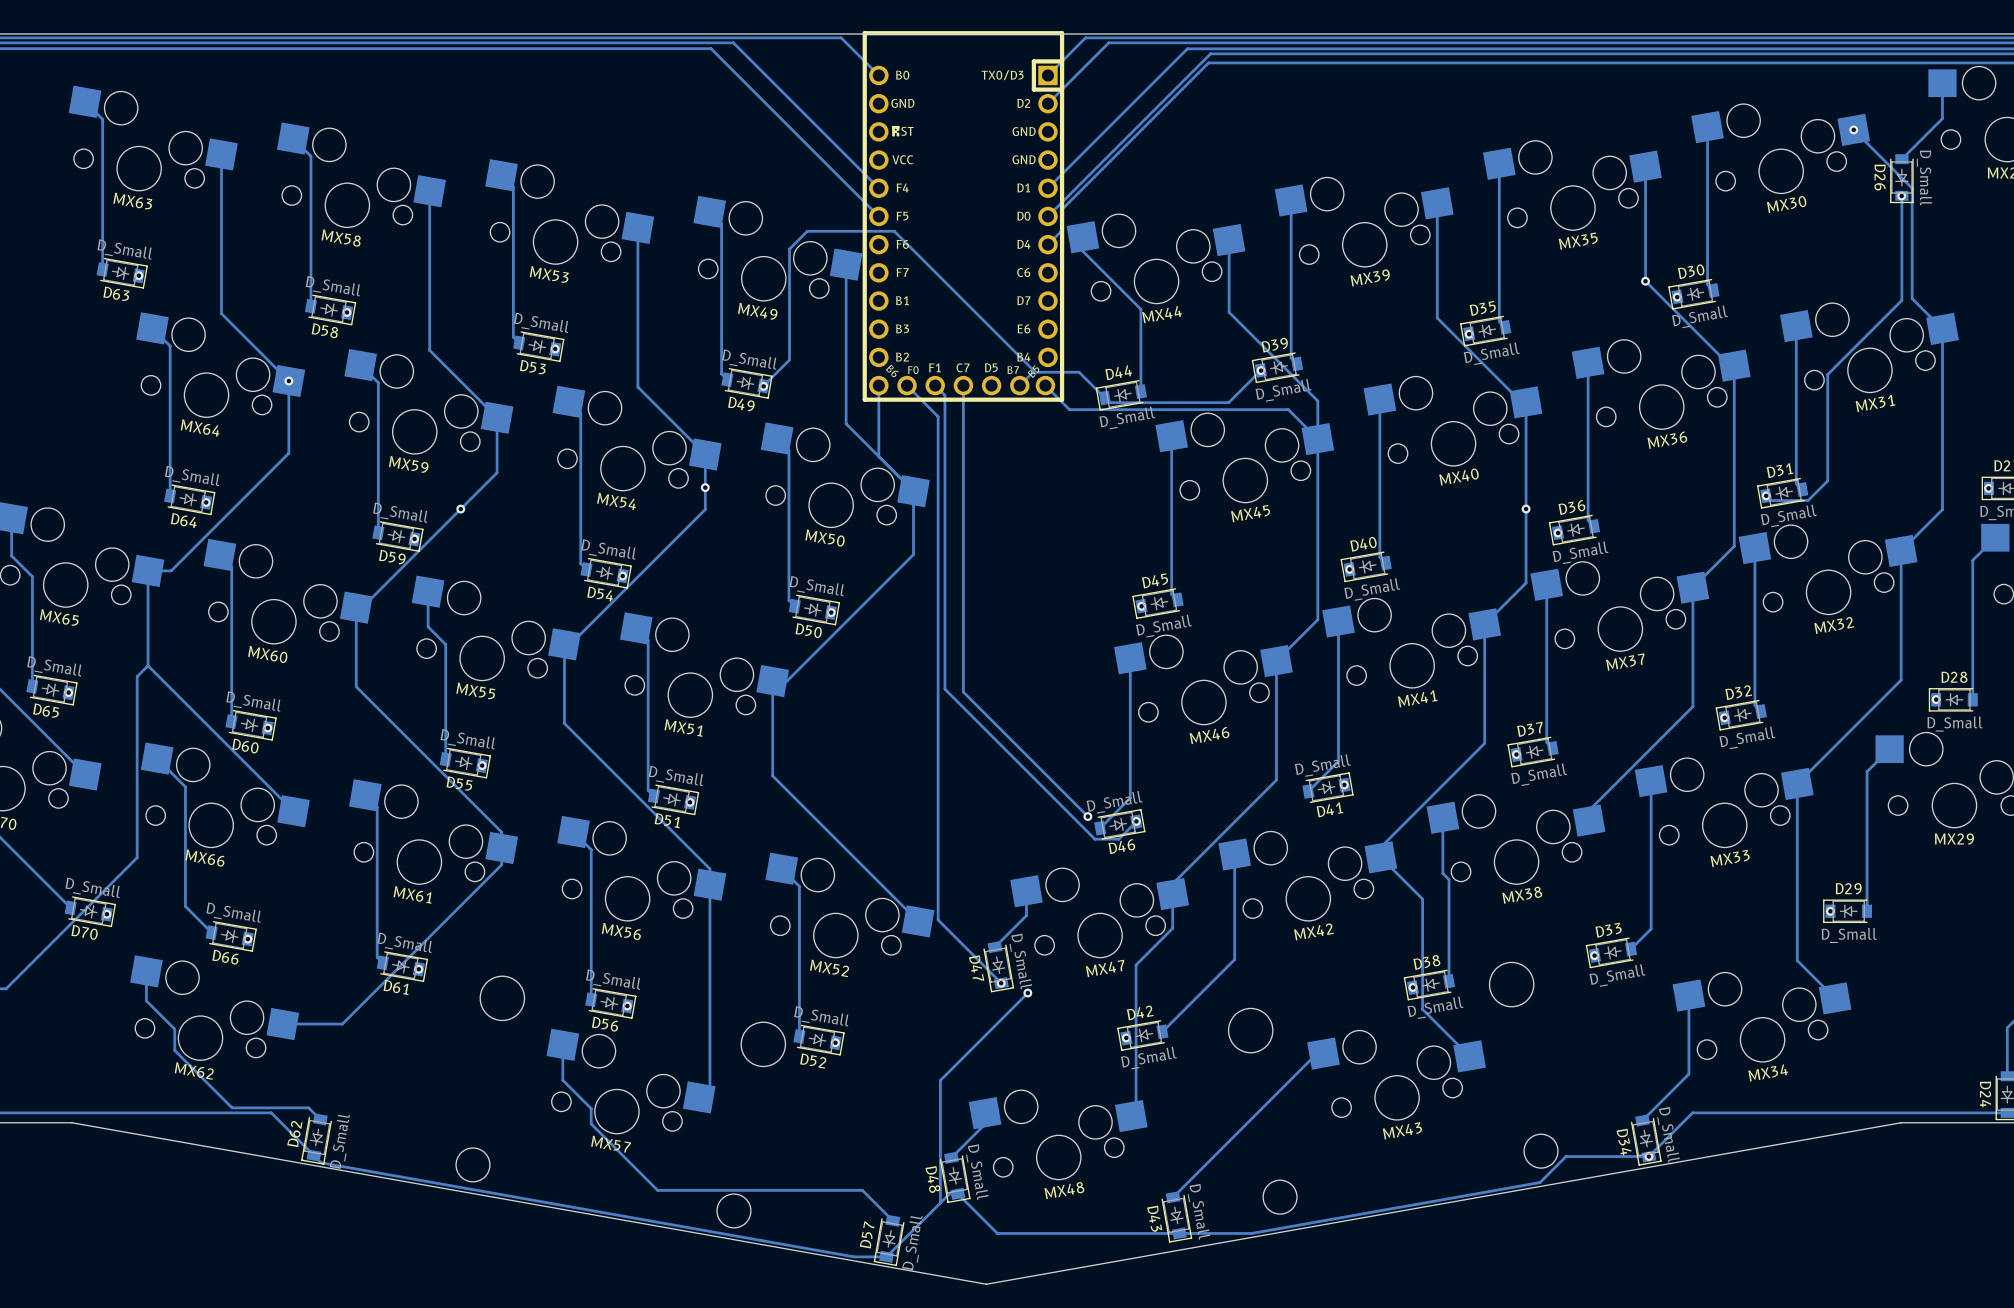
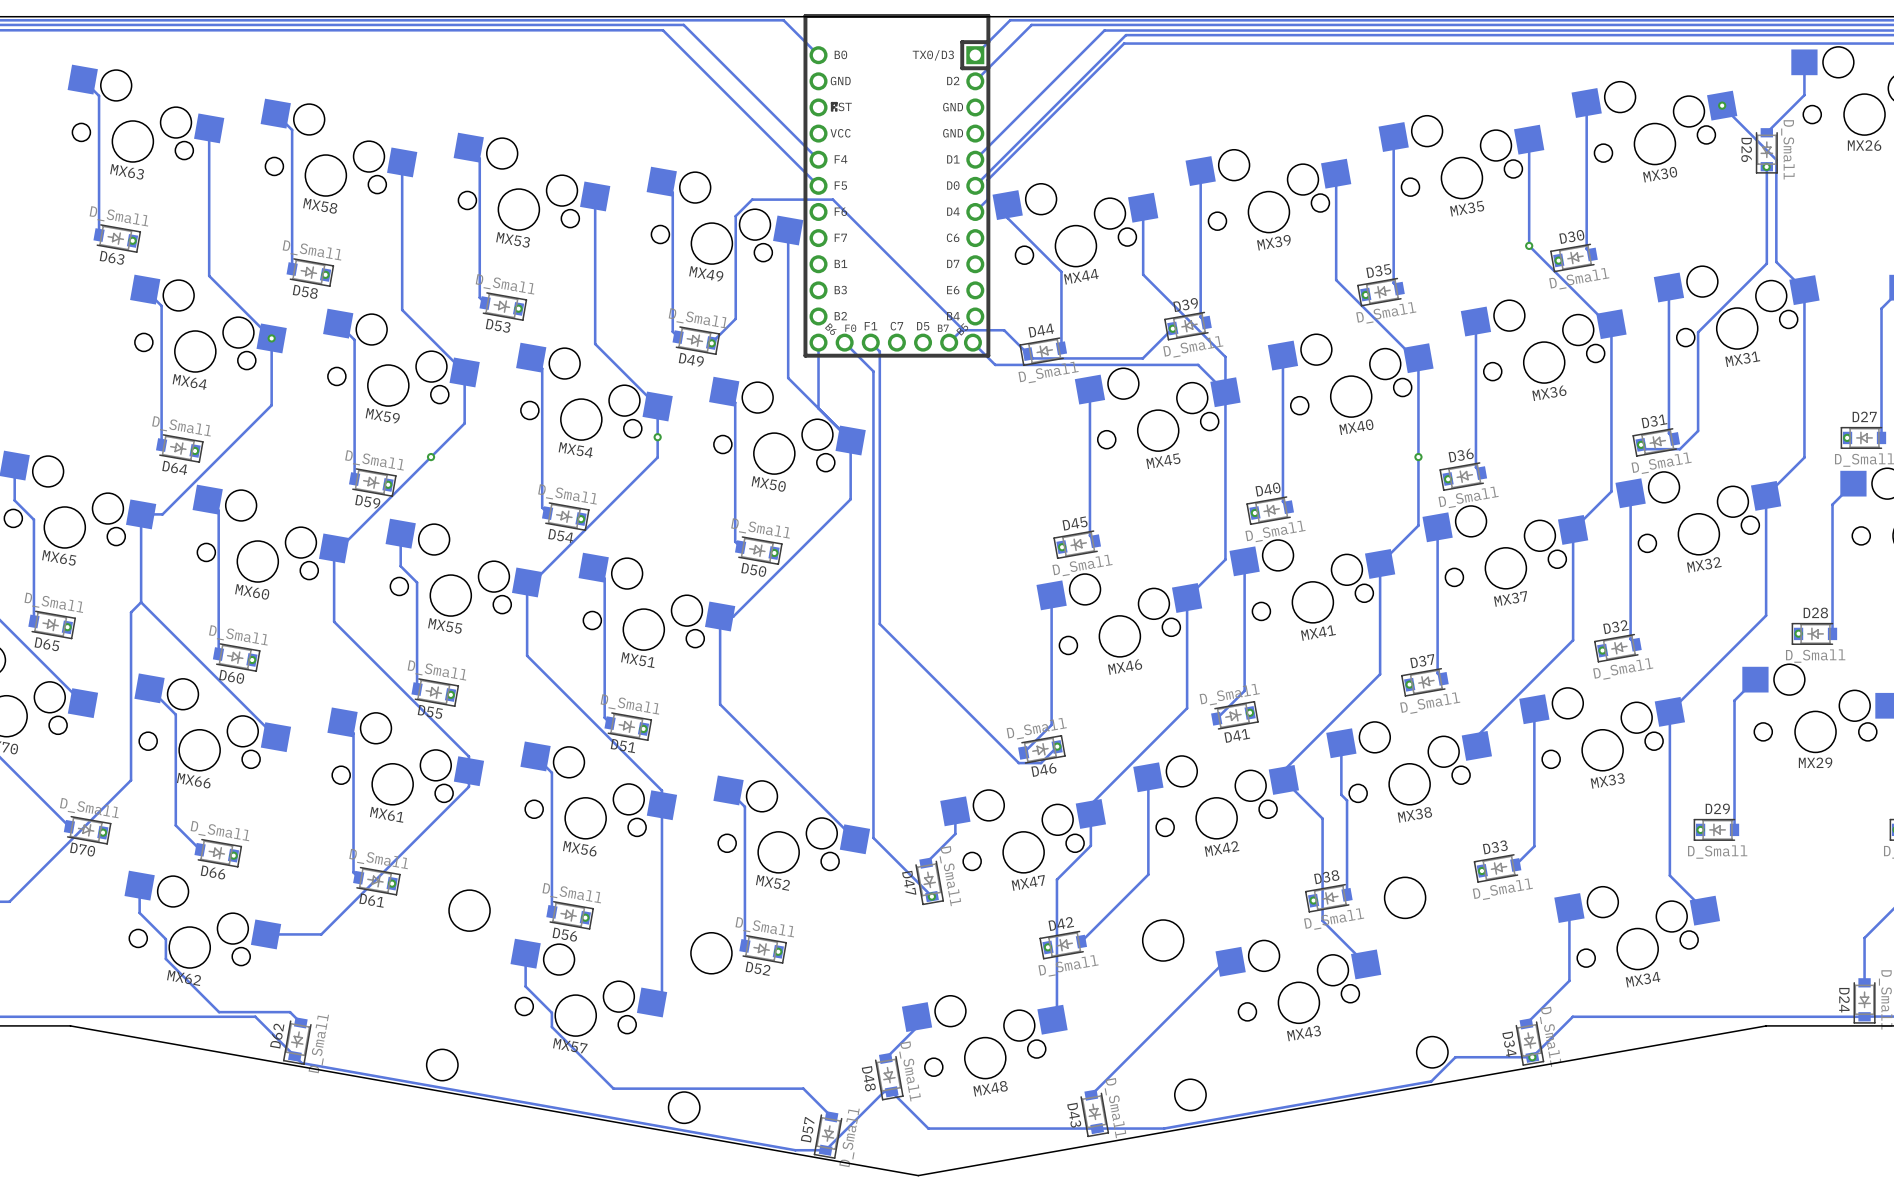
track: (963, 385) (963, 692) (1087, 816) -> none
via: (1087, 816) -> none
track: (1027, 993) (940, 1080) (940, 1202) -> none
via: (1027, 993) -> none

